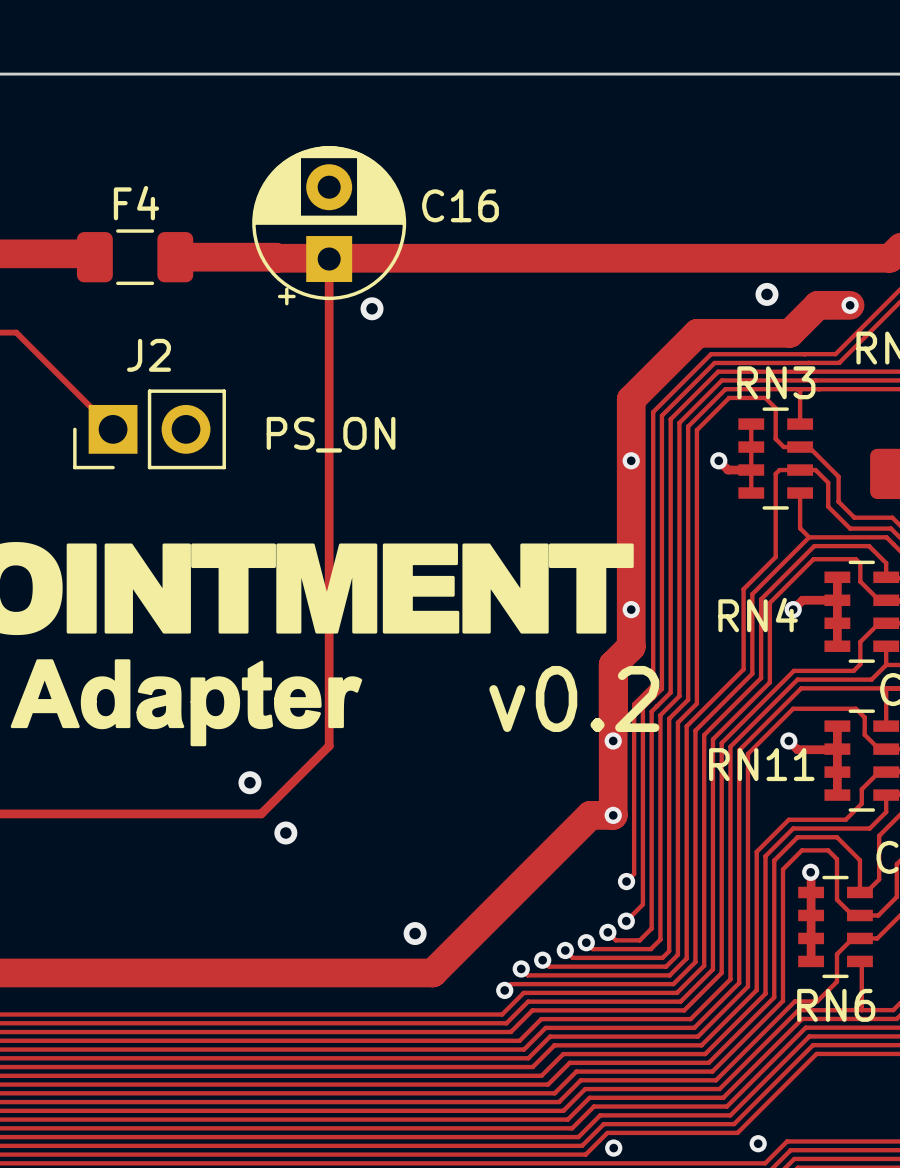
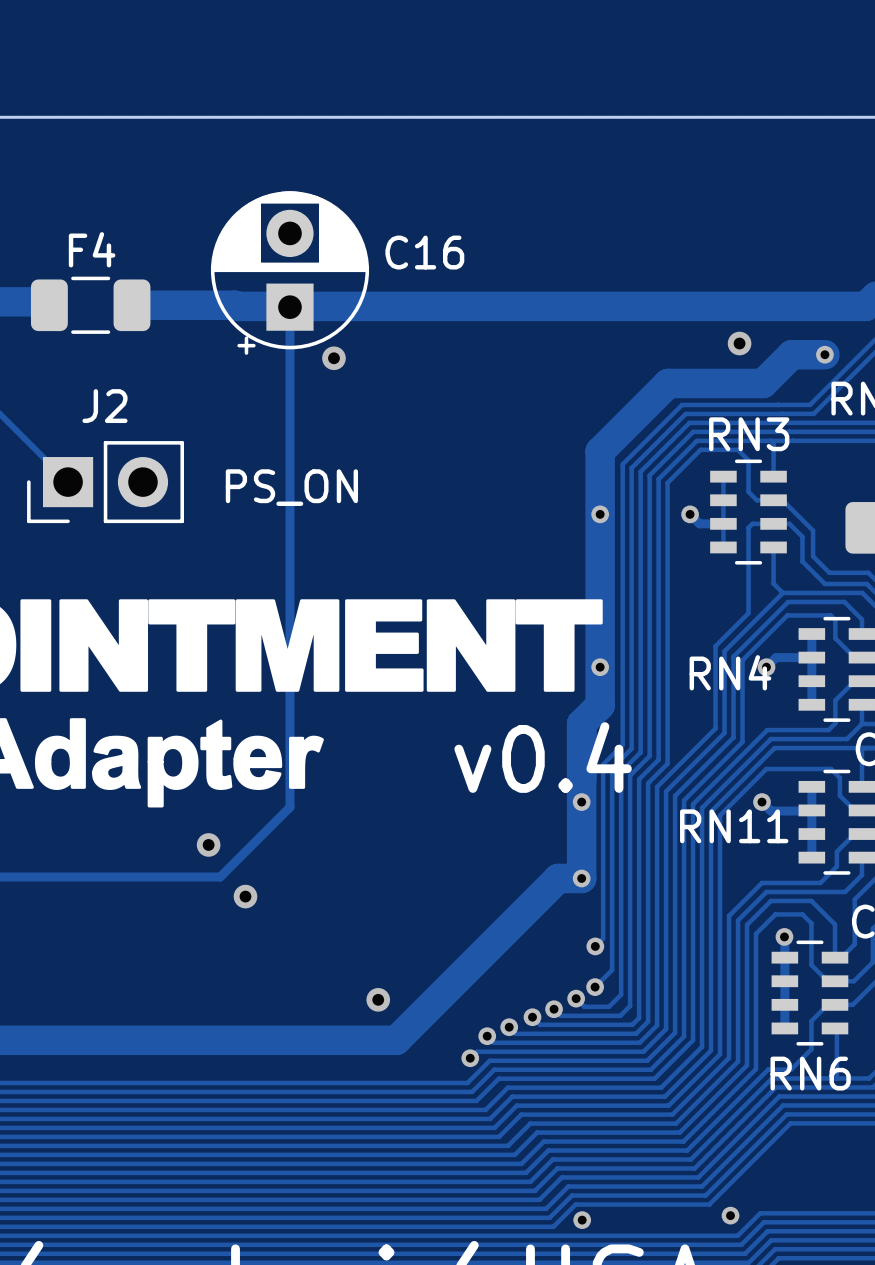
text: v0.2 (574, 698) -> v0.4 (543, 757)

